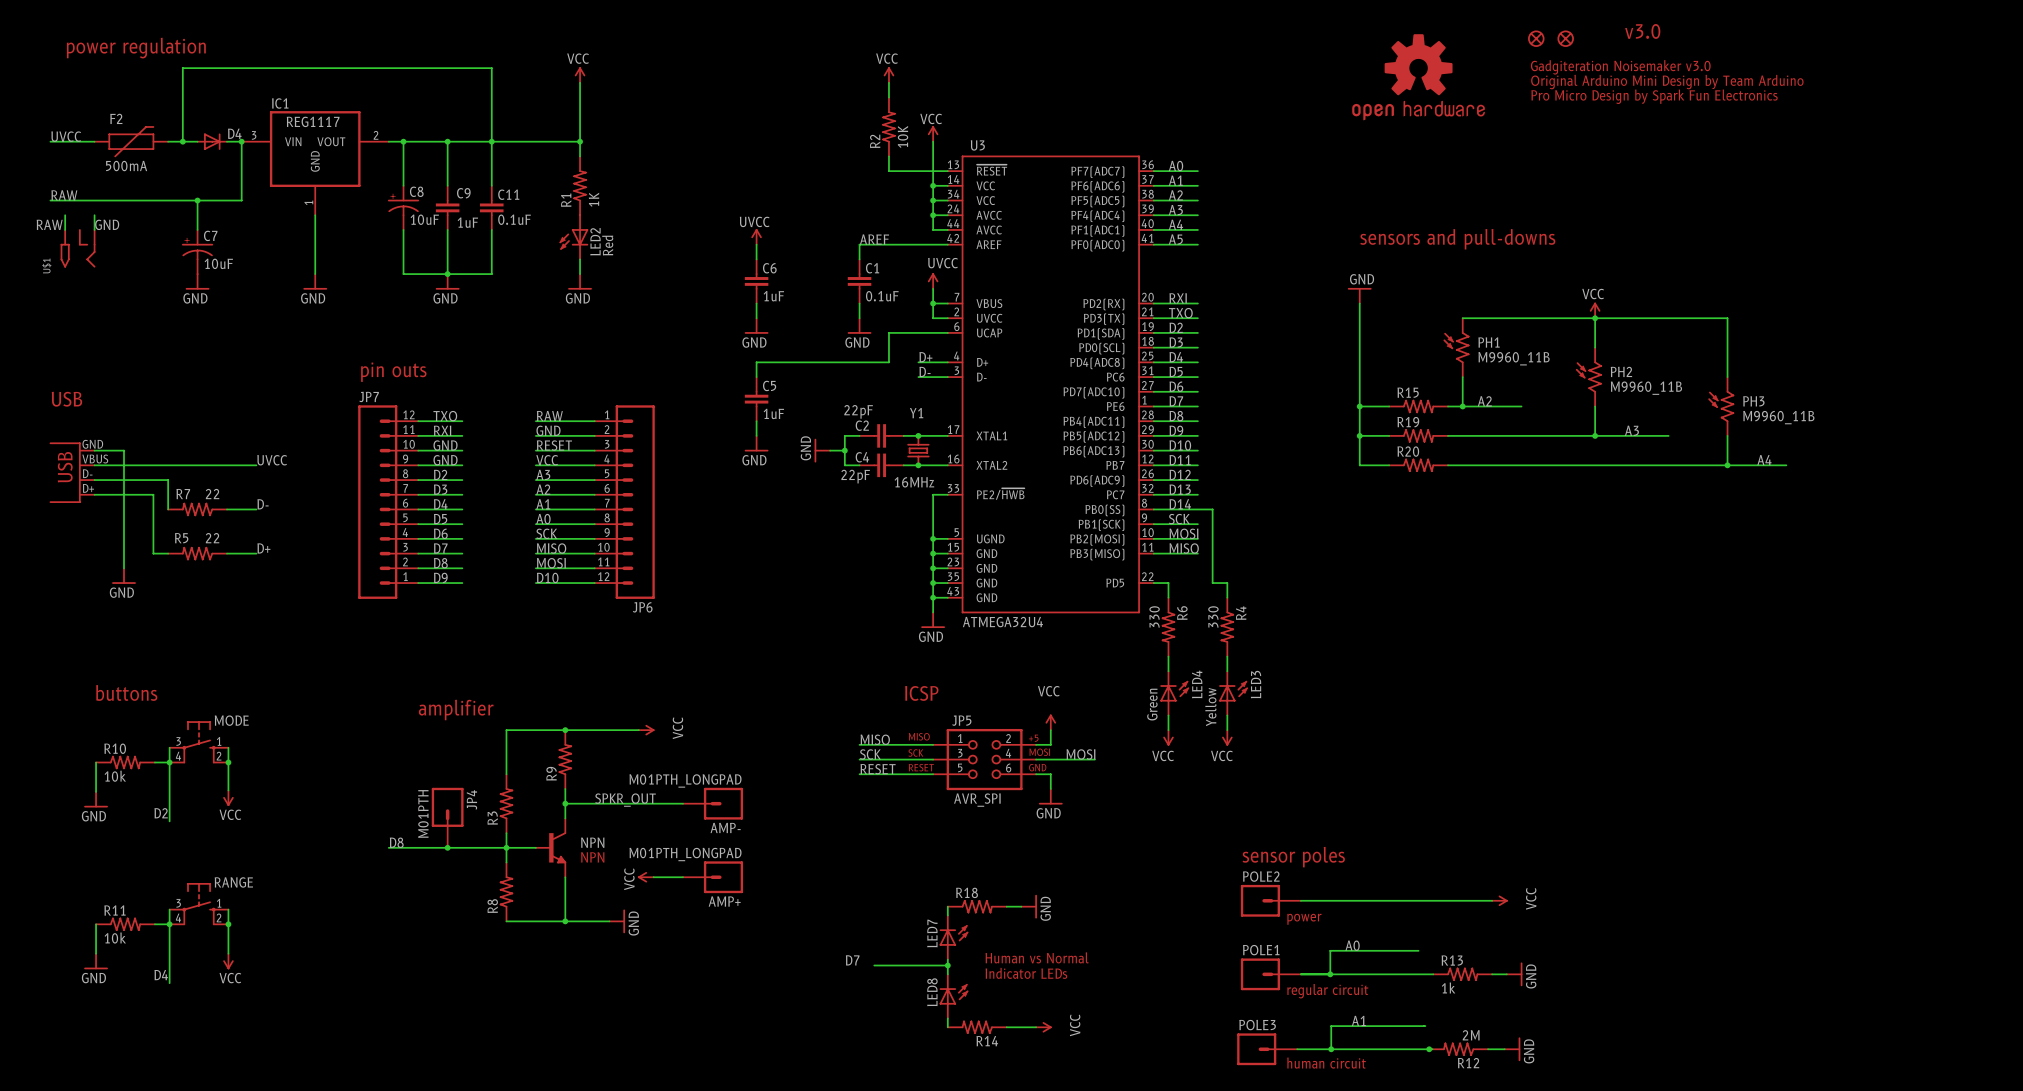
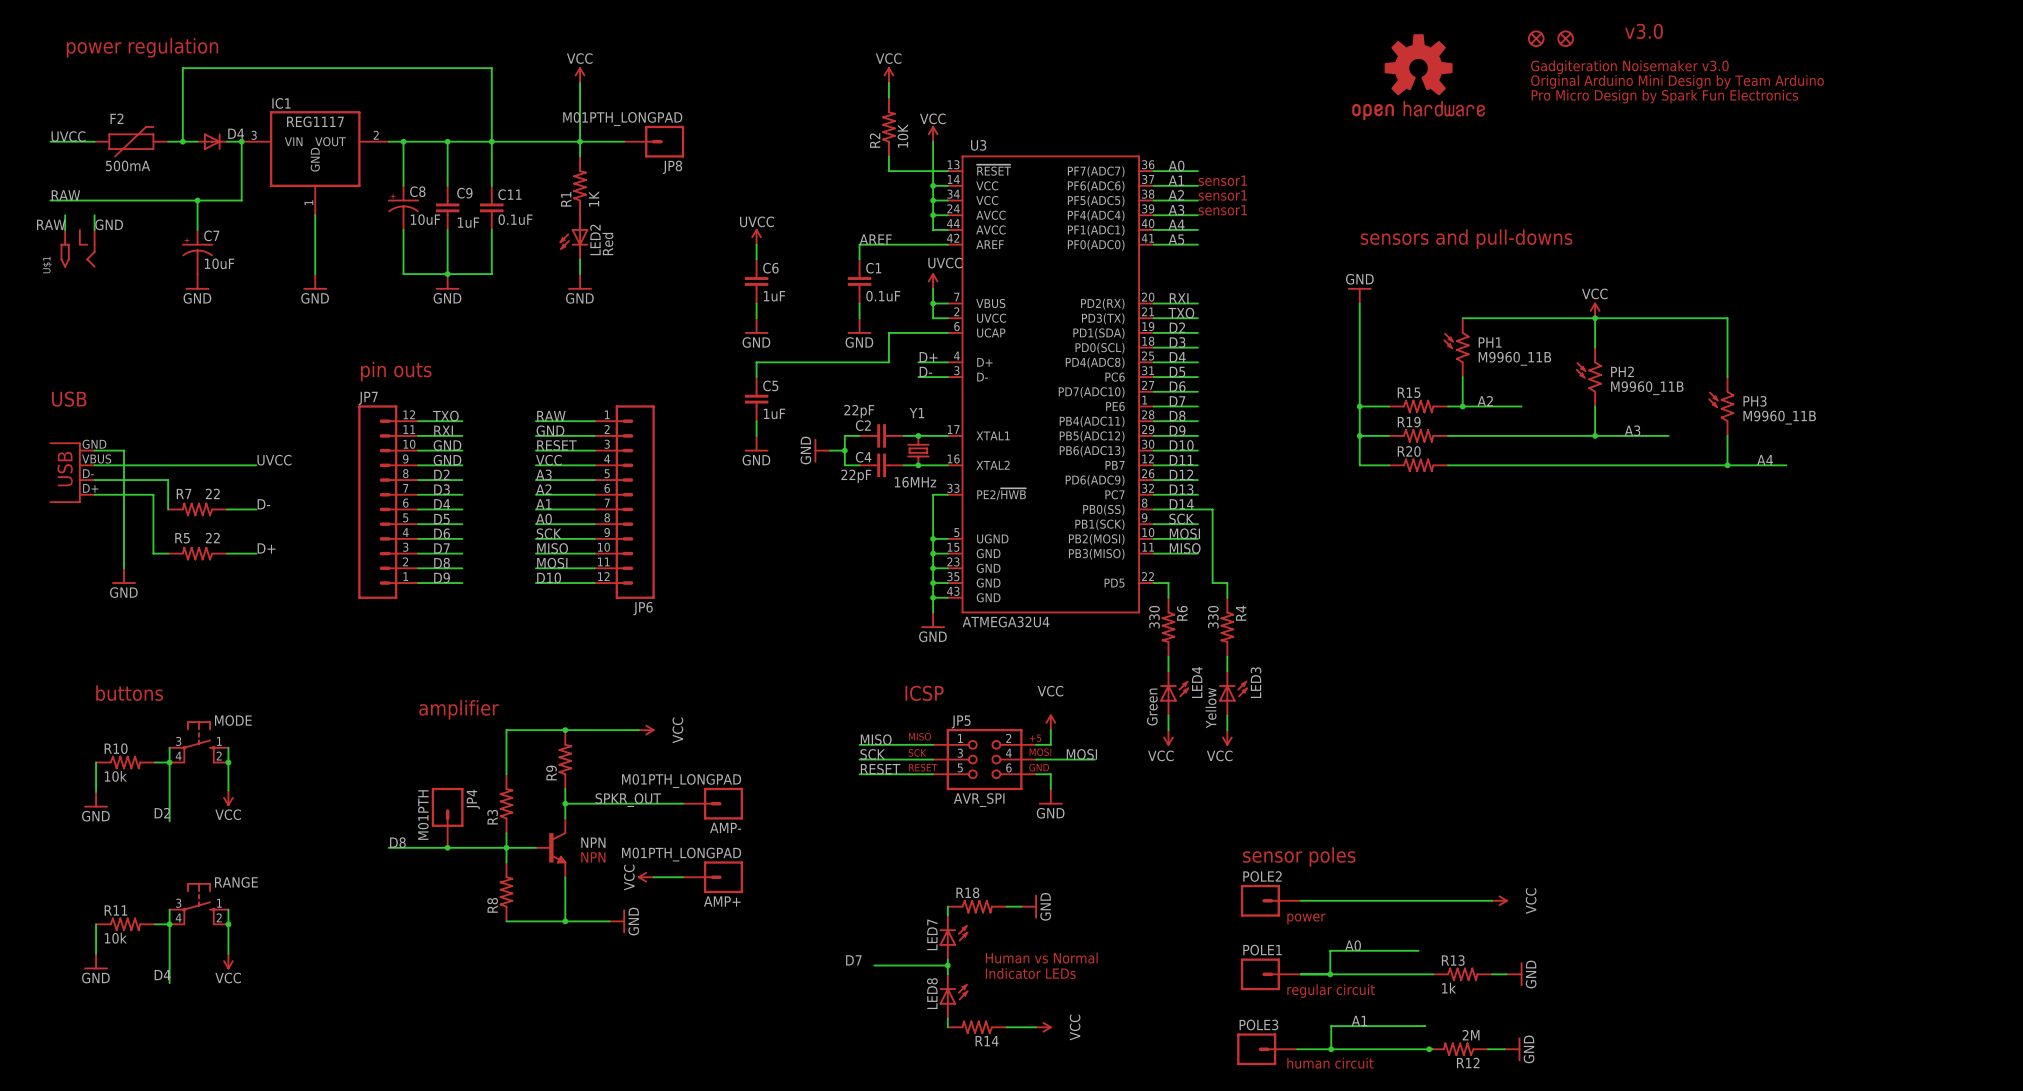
wire: none -> (580, 141) (624, 141)
JP8: none -> M01PTH_LONGPAD (654, 141)
text: none -> sensor1 (1222, 180)
text: none -> sensor1 (1222, 195)
text: none -> sensor1 (1222, 210)

